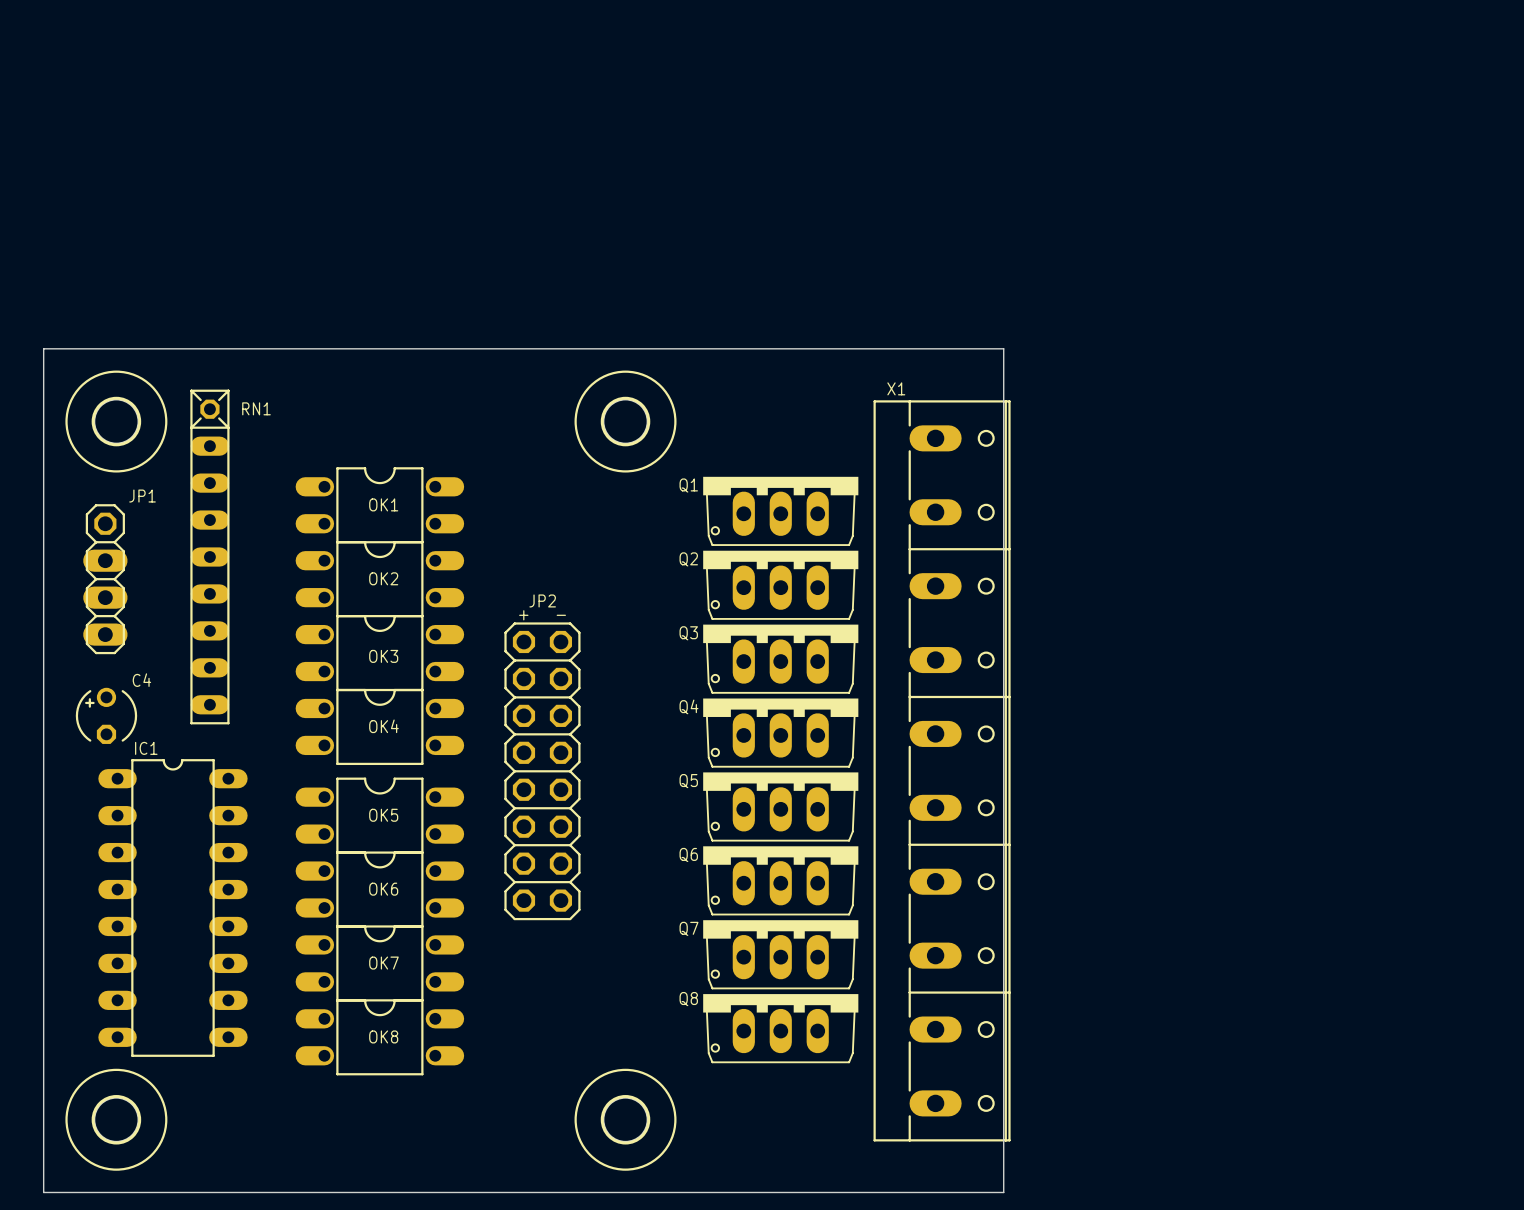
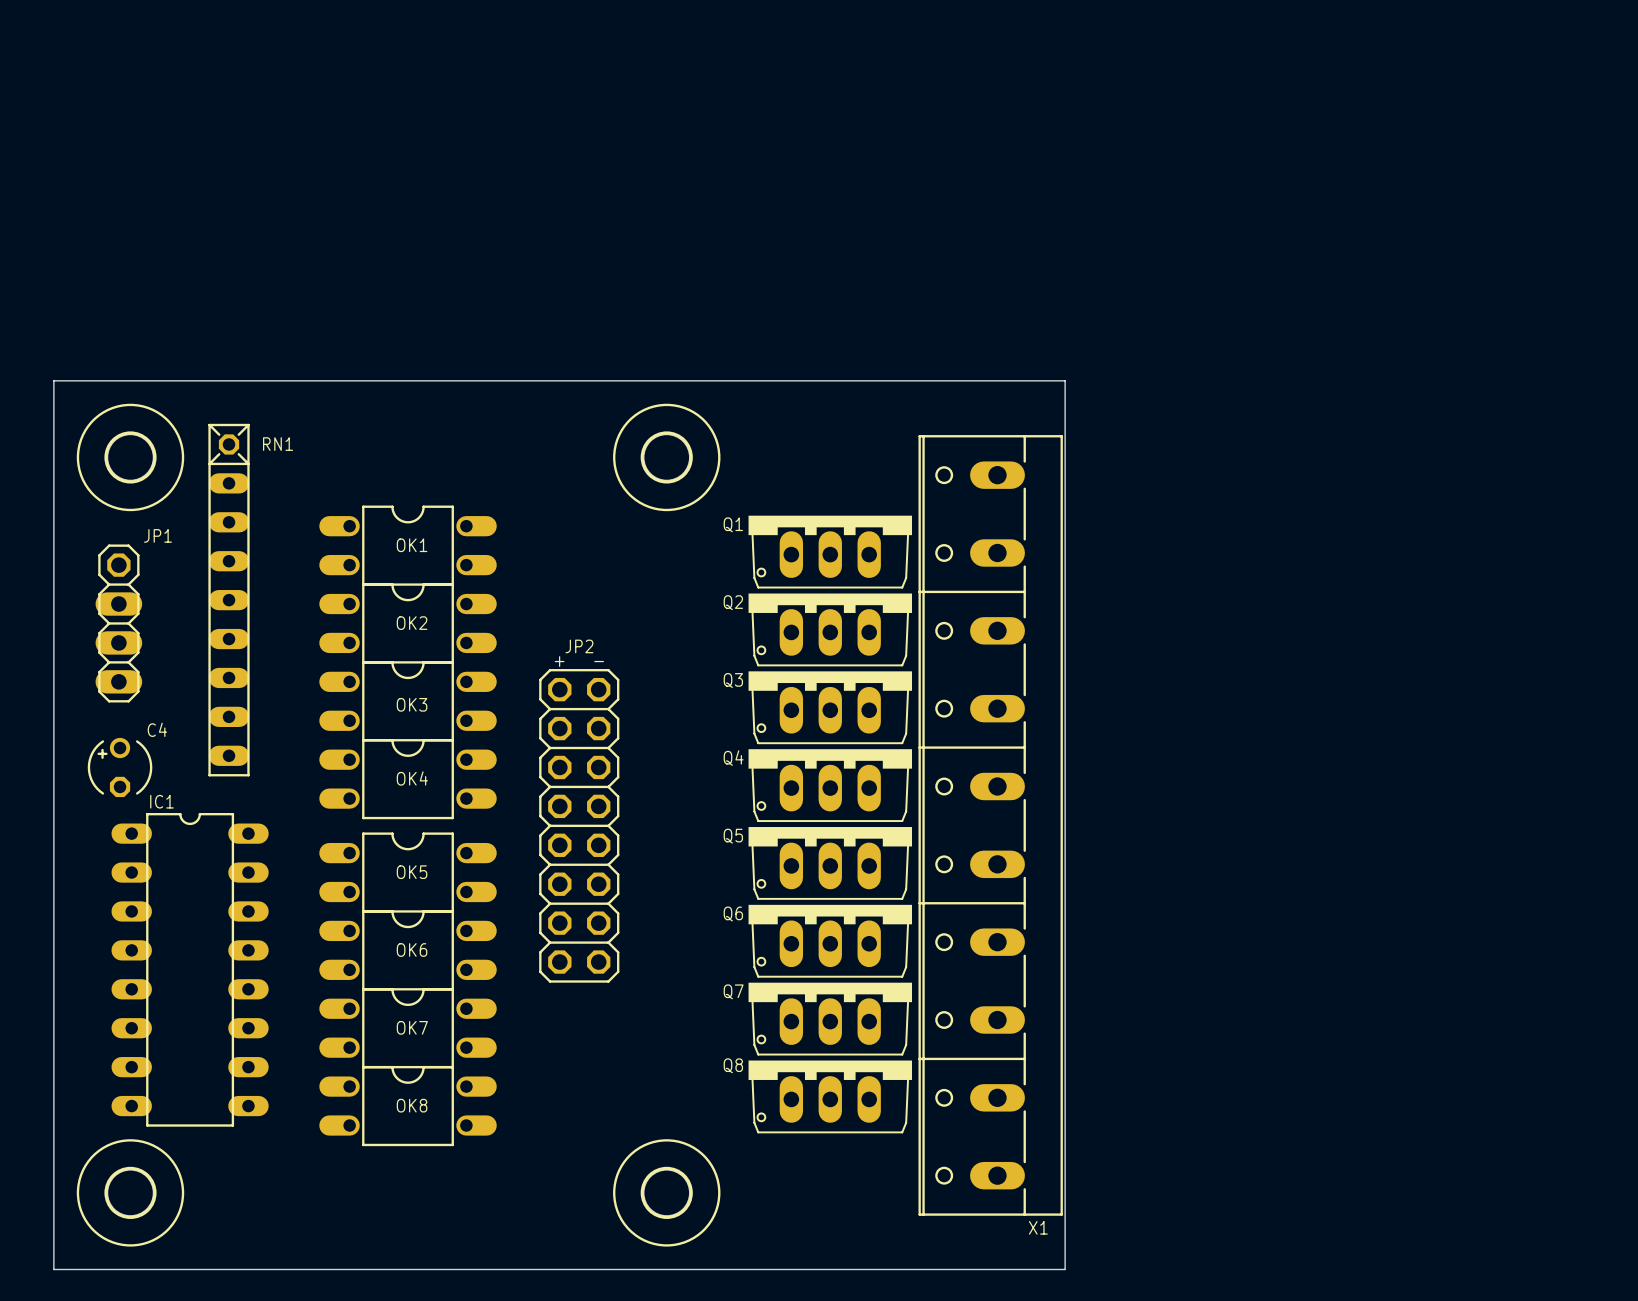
X1 rotation: 0° (942, 770) -> 180° (990, 825)

